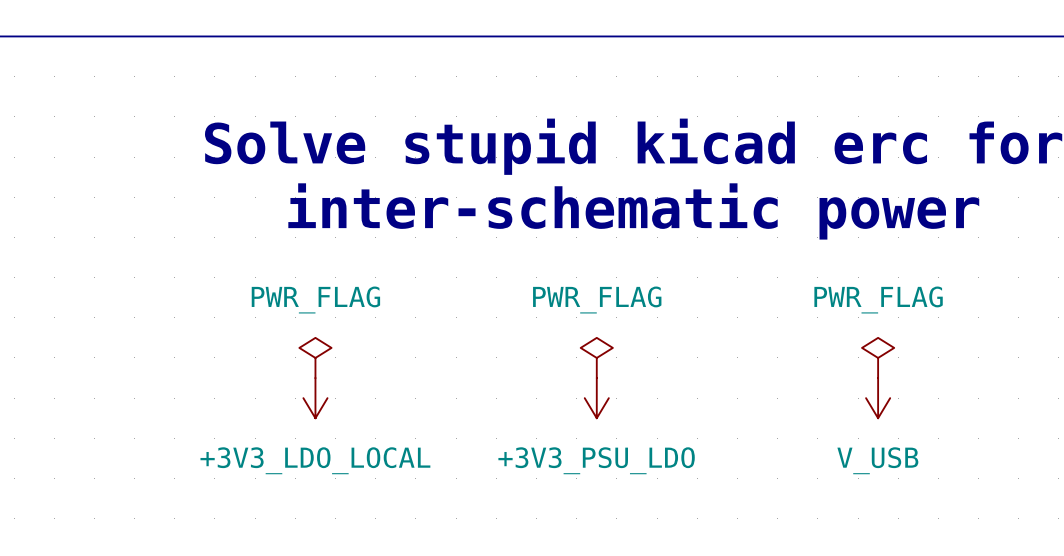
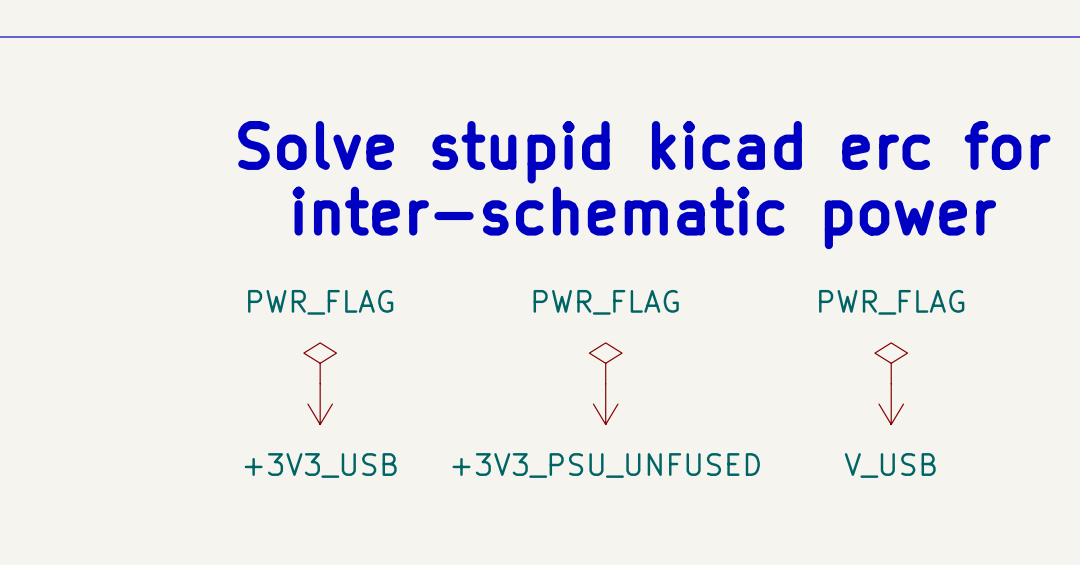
power symbol: +3V3_LDO_LOCAL (315, 398) -> +3V3_USB (320, 404)
power symbol: +3V3_PSU_LDO (596, 398) -> +3V3_PSU_UNFUSED (605, 404)

